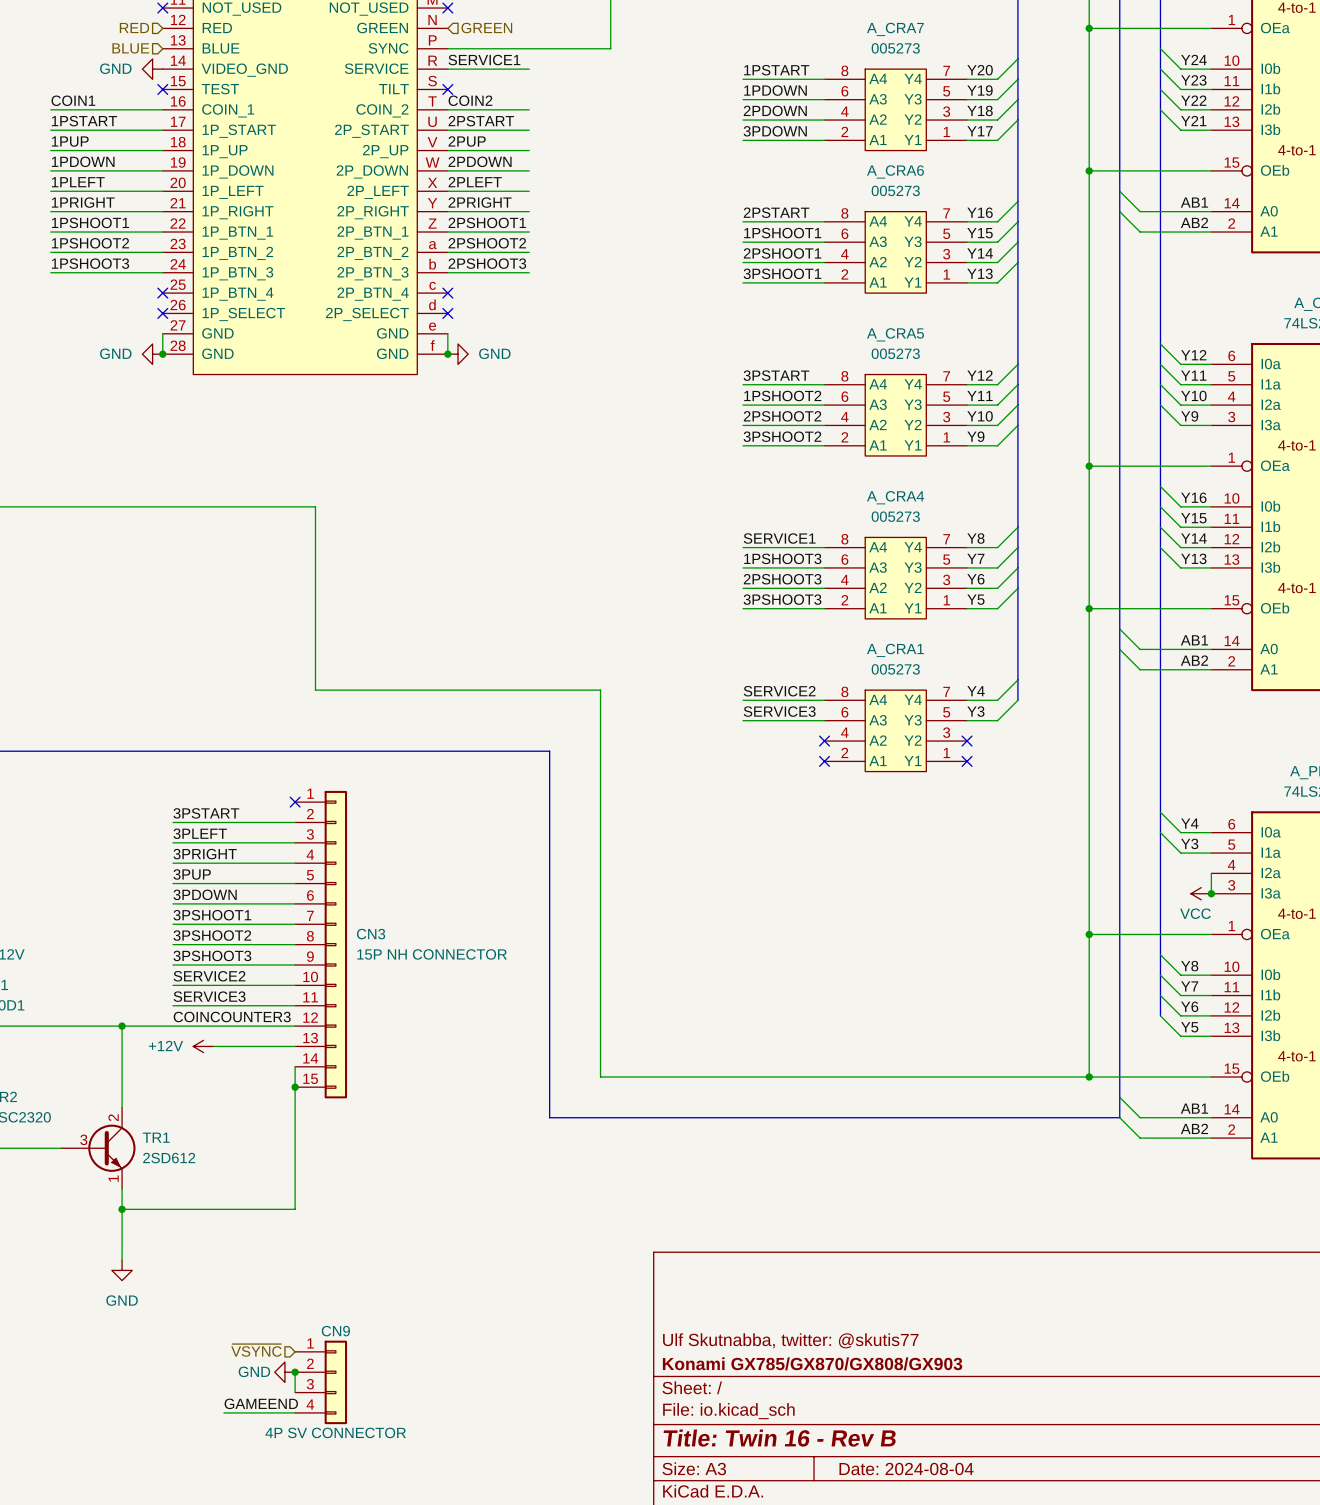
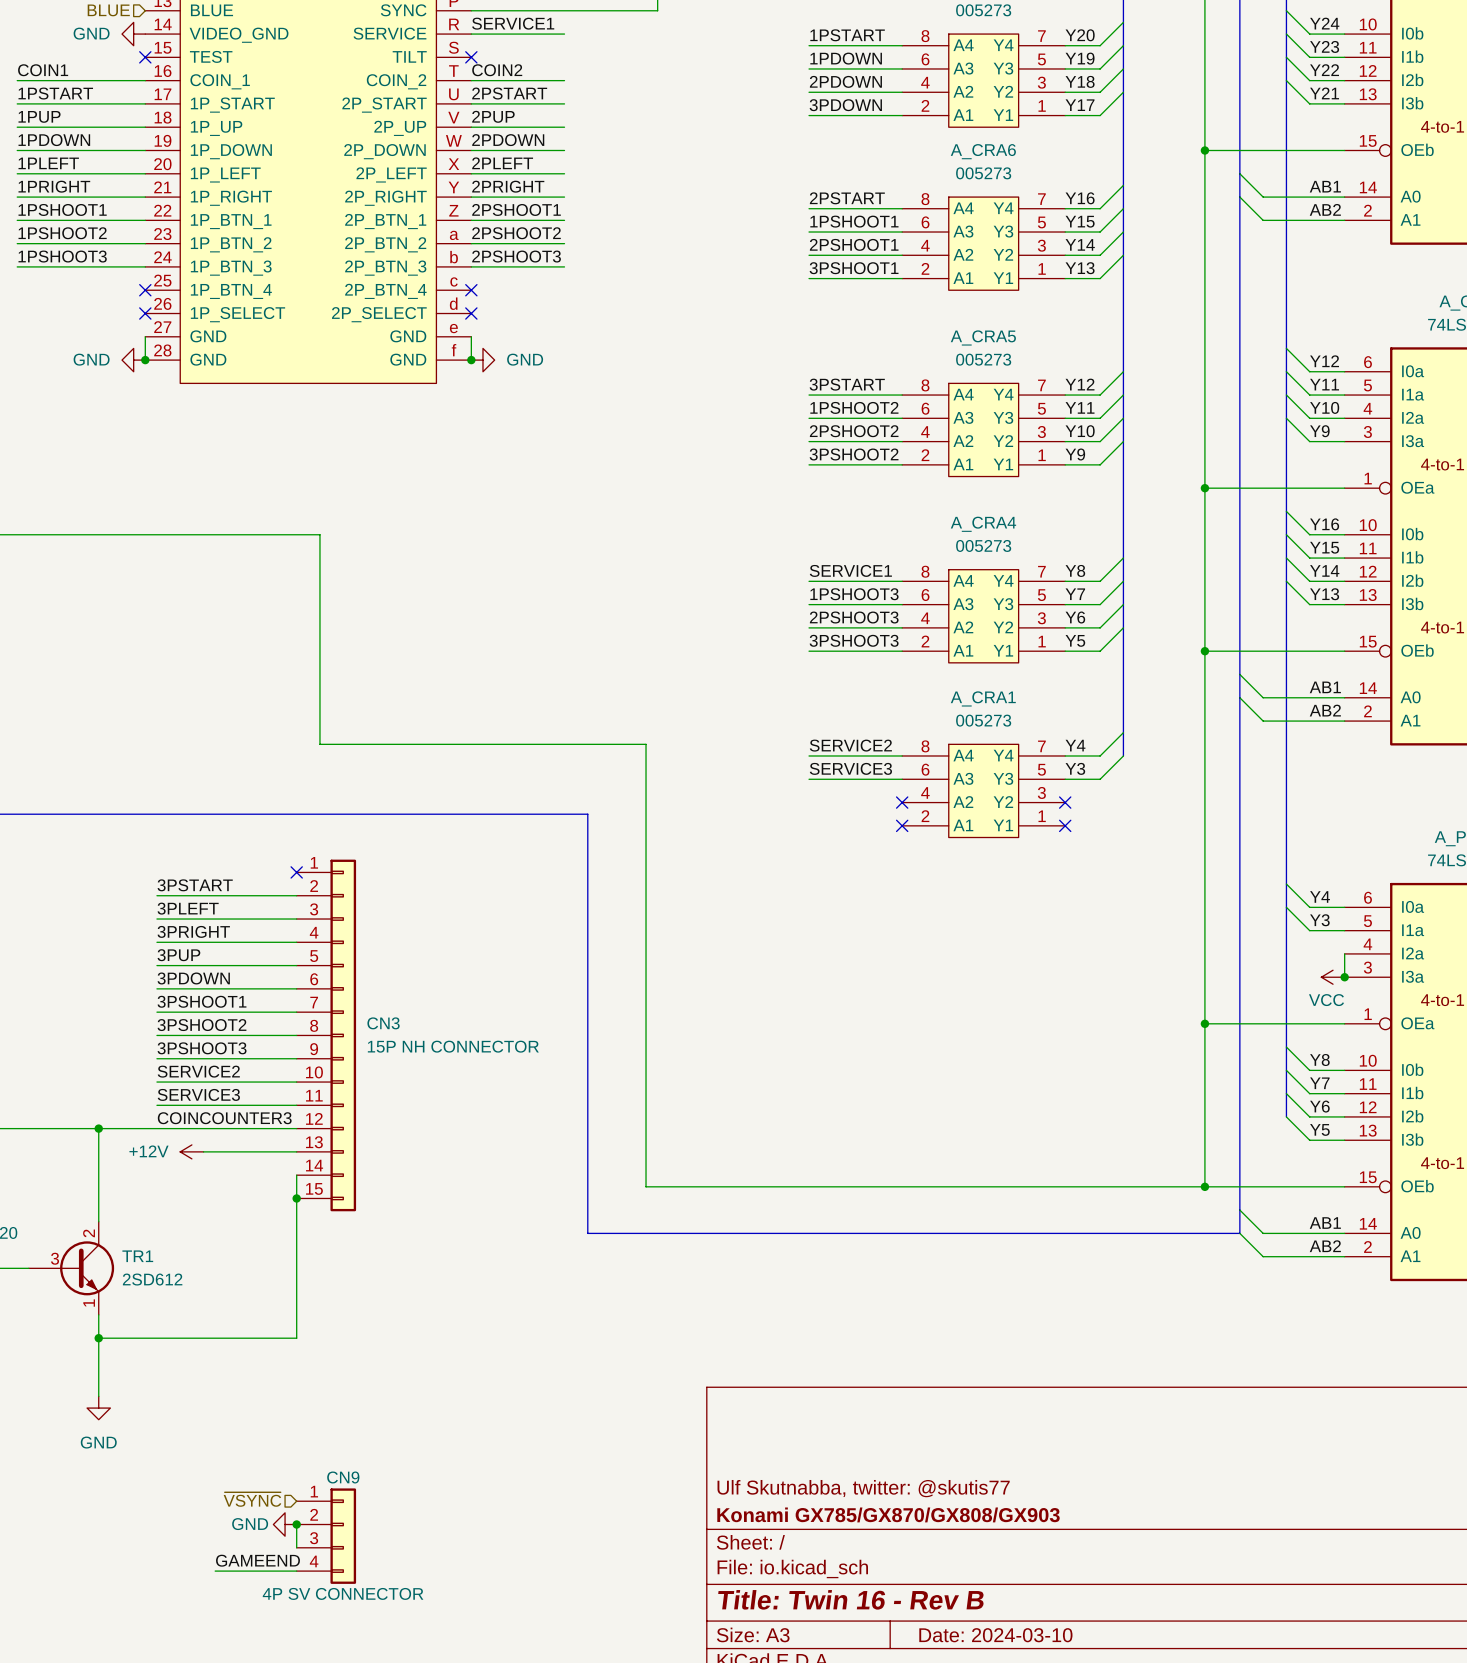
title block: Date: 2024-08-04 (906, 1469) -> Date: 2024-03-10 (995, 1635)

